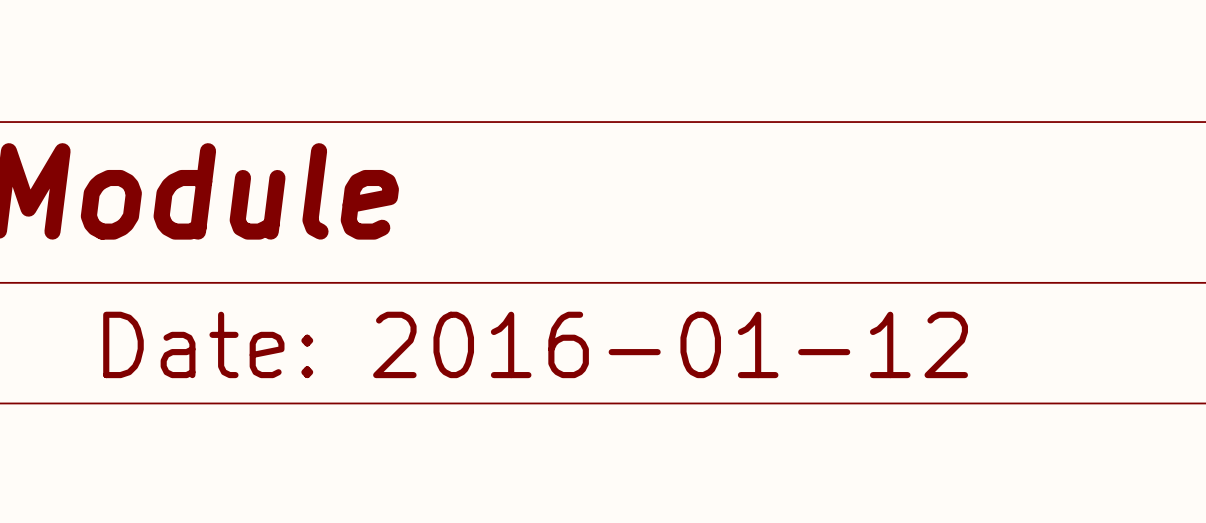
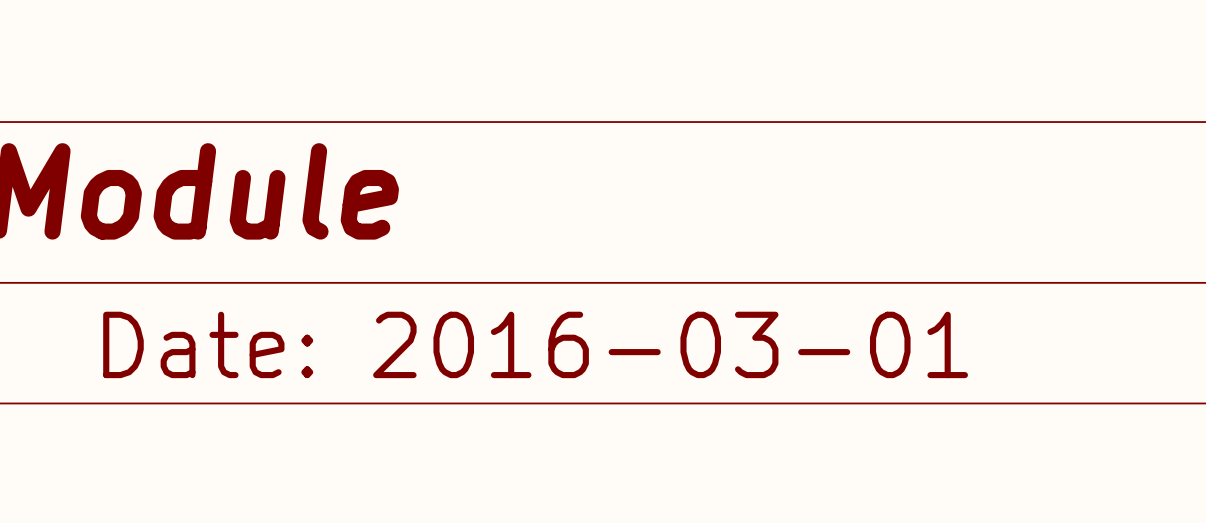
title block: Date: 2016-01-12 (535, 344) -> Date: 2016-03-01 (535, 344)

